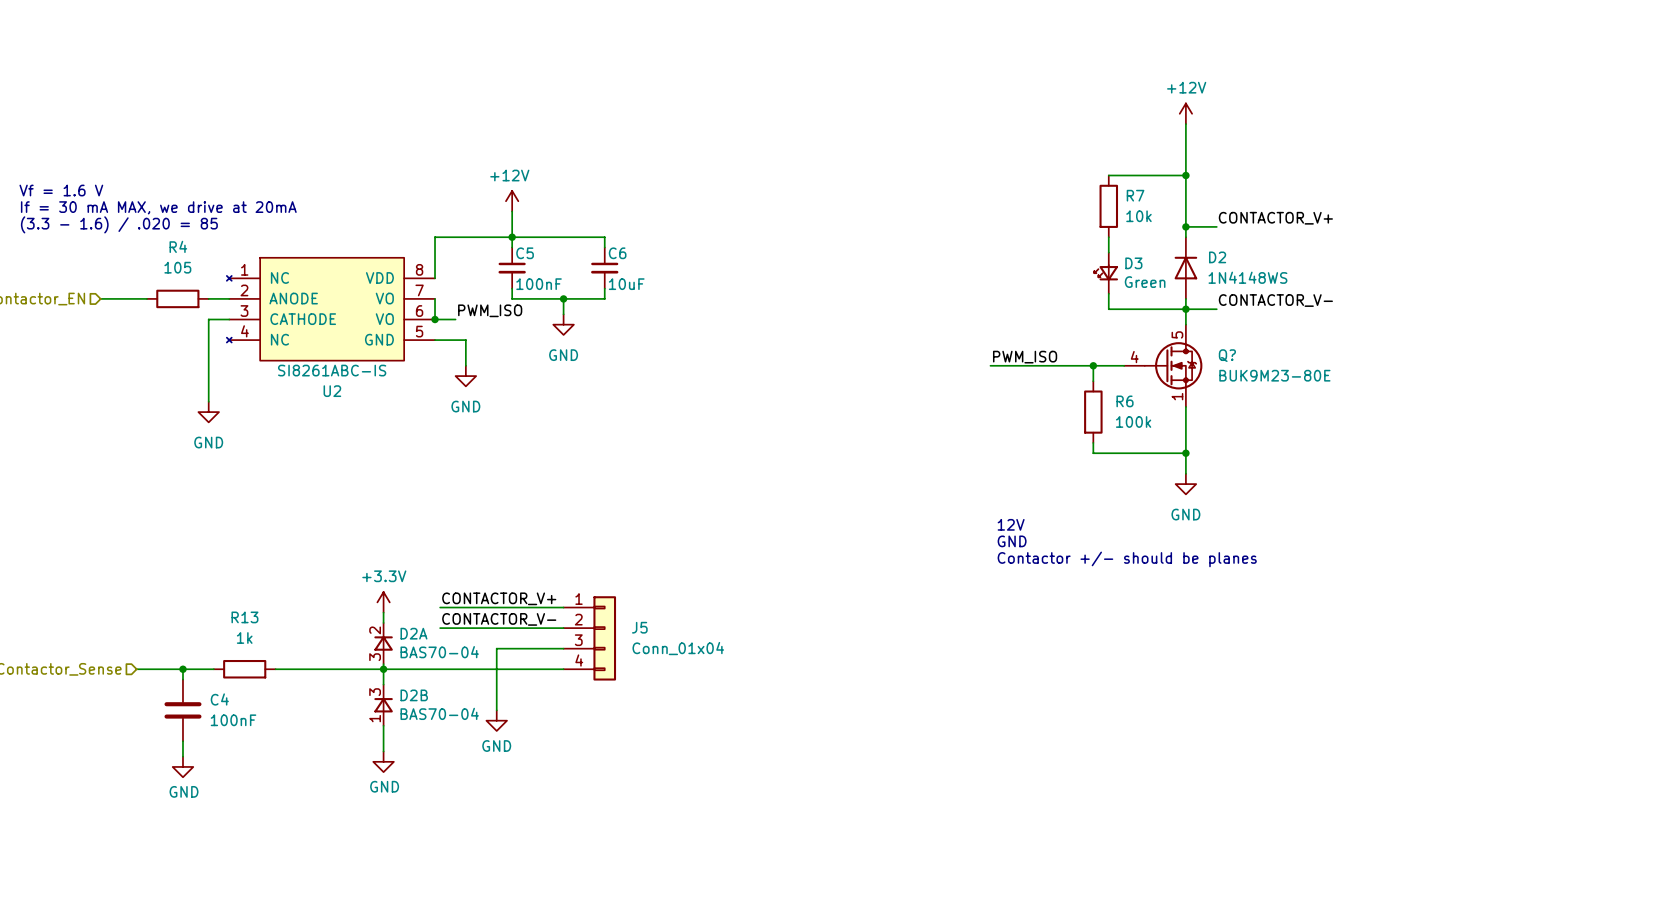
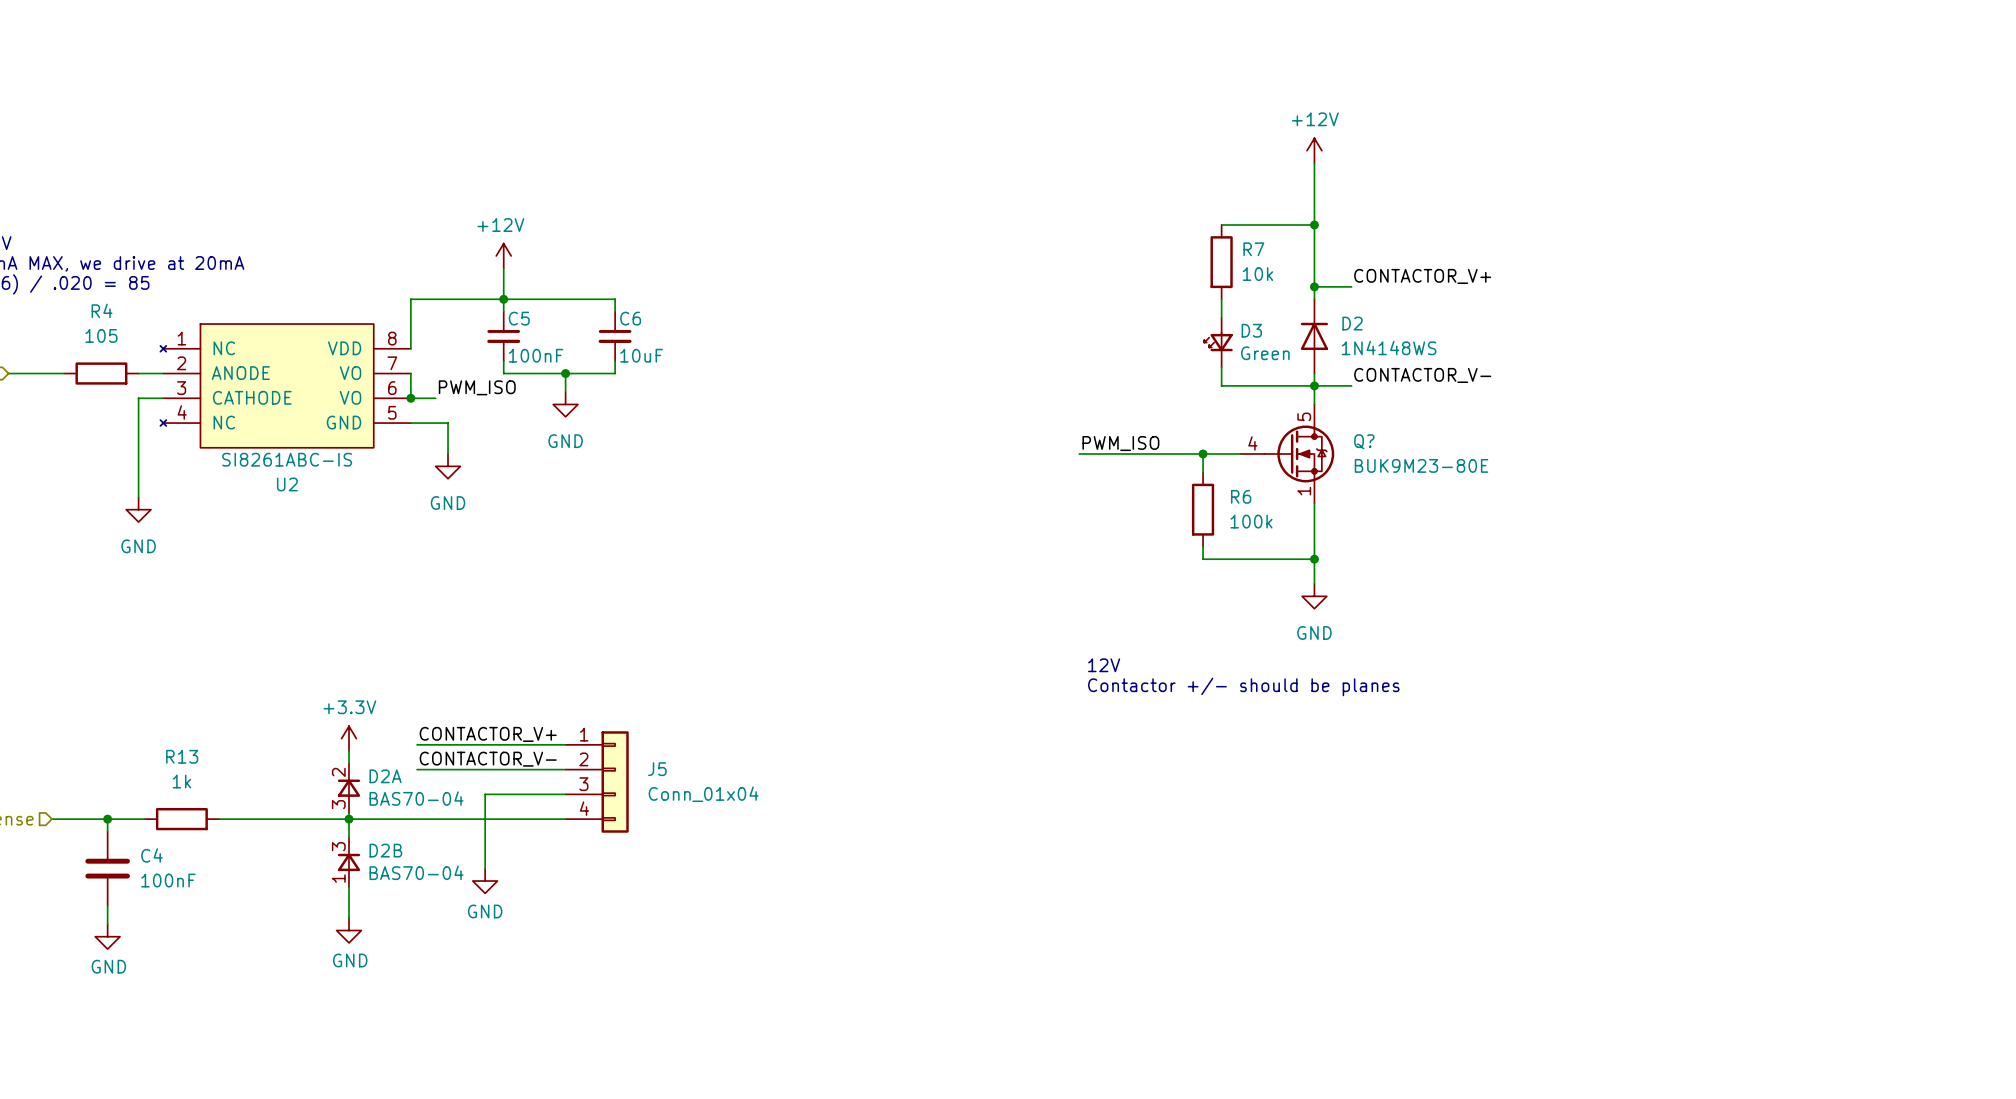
text: 12V (1011, 524) -> none
text: GND (1012, 541) -> 12V (1104, 665)

